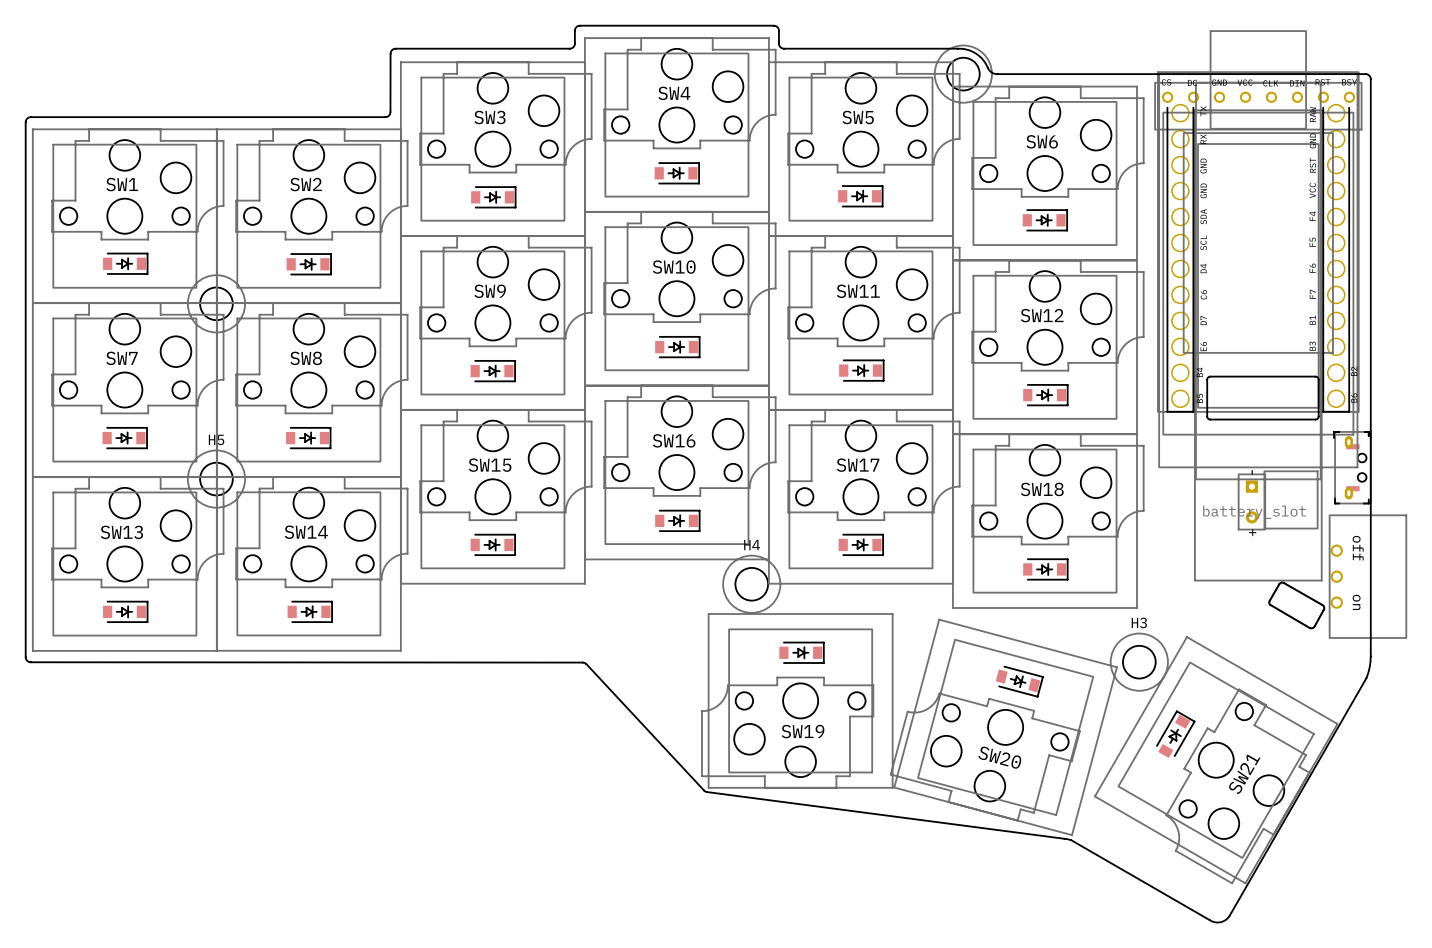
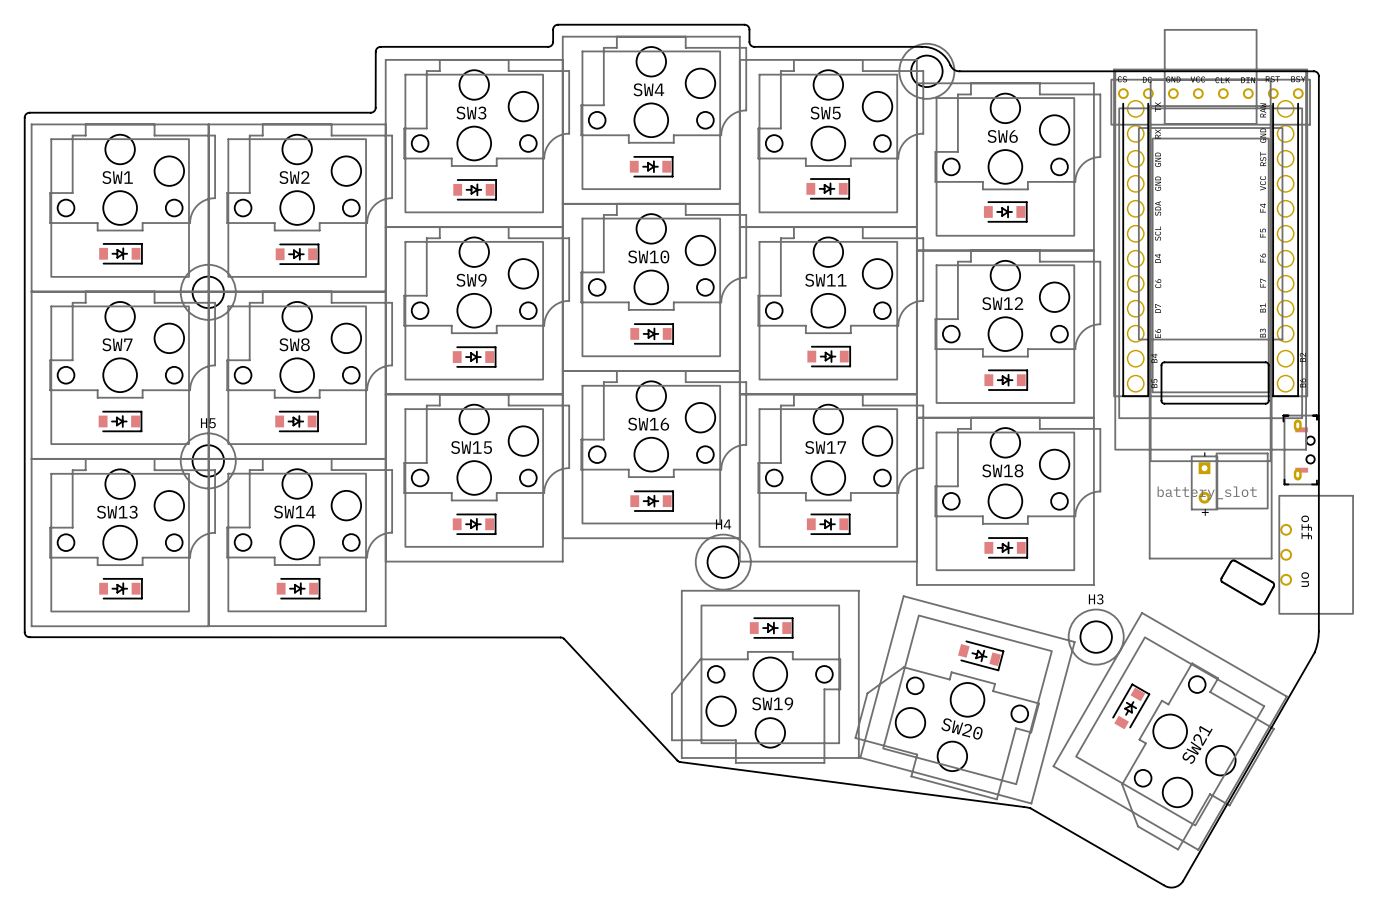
SW19 footprint: [701, 613, 894, 789] -> [671, 590, 860, 764]
SW20 footprint: [890, 618, 1118, 836] -> [854, 595, 1076, 805]
SW21 footprint: [1094, 636, 1339, 885] -> [1052, 612, 1288, 851]

